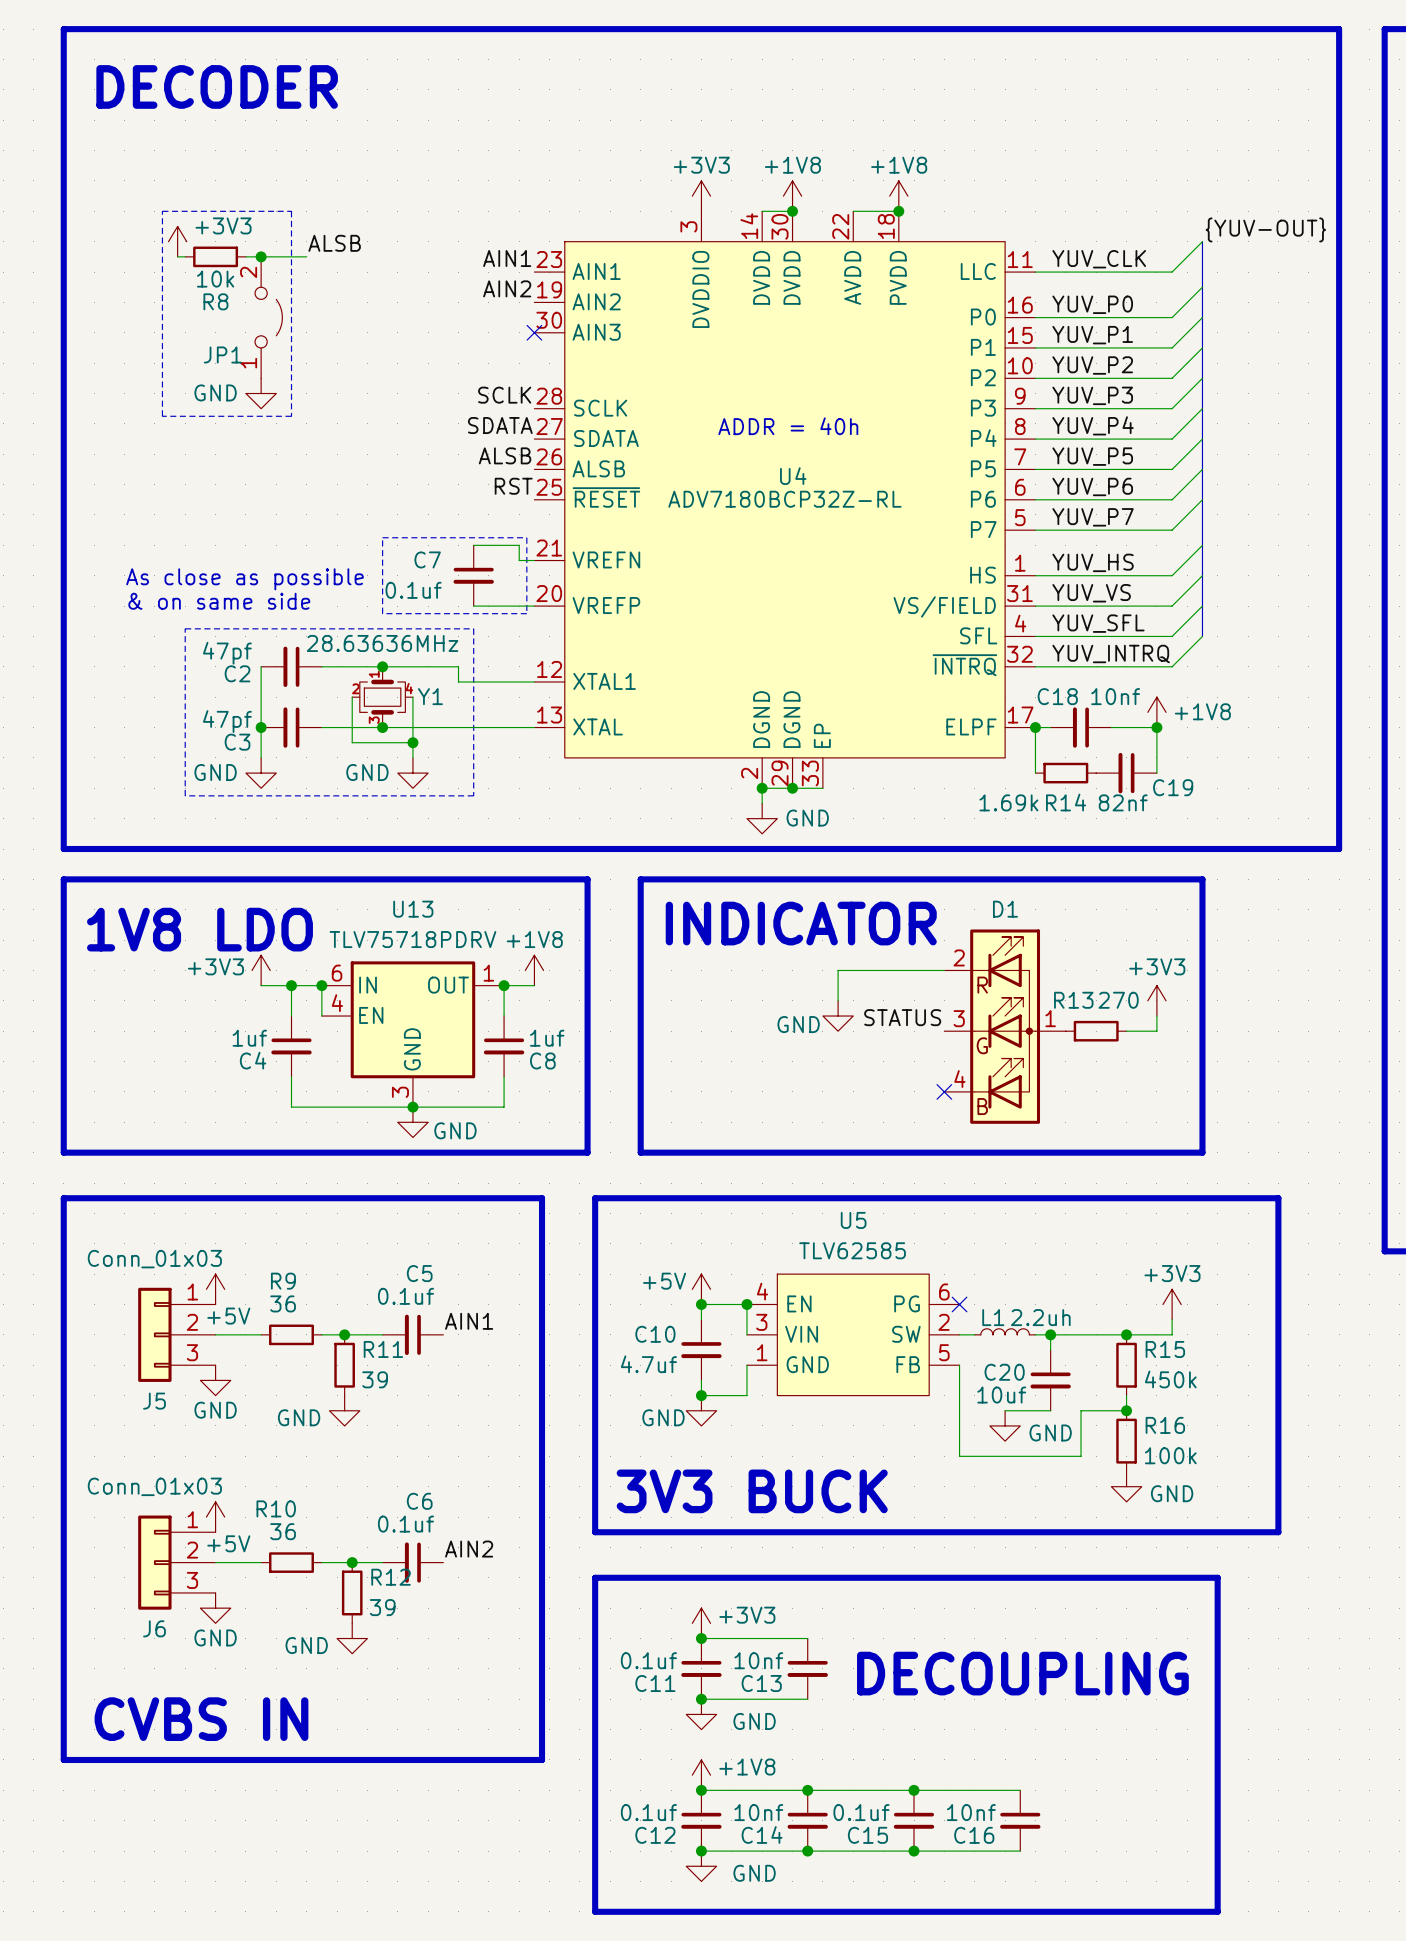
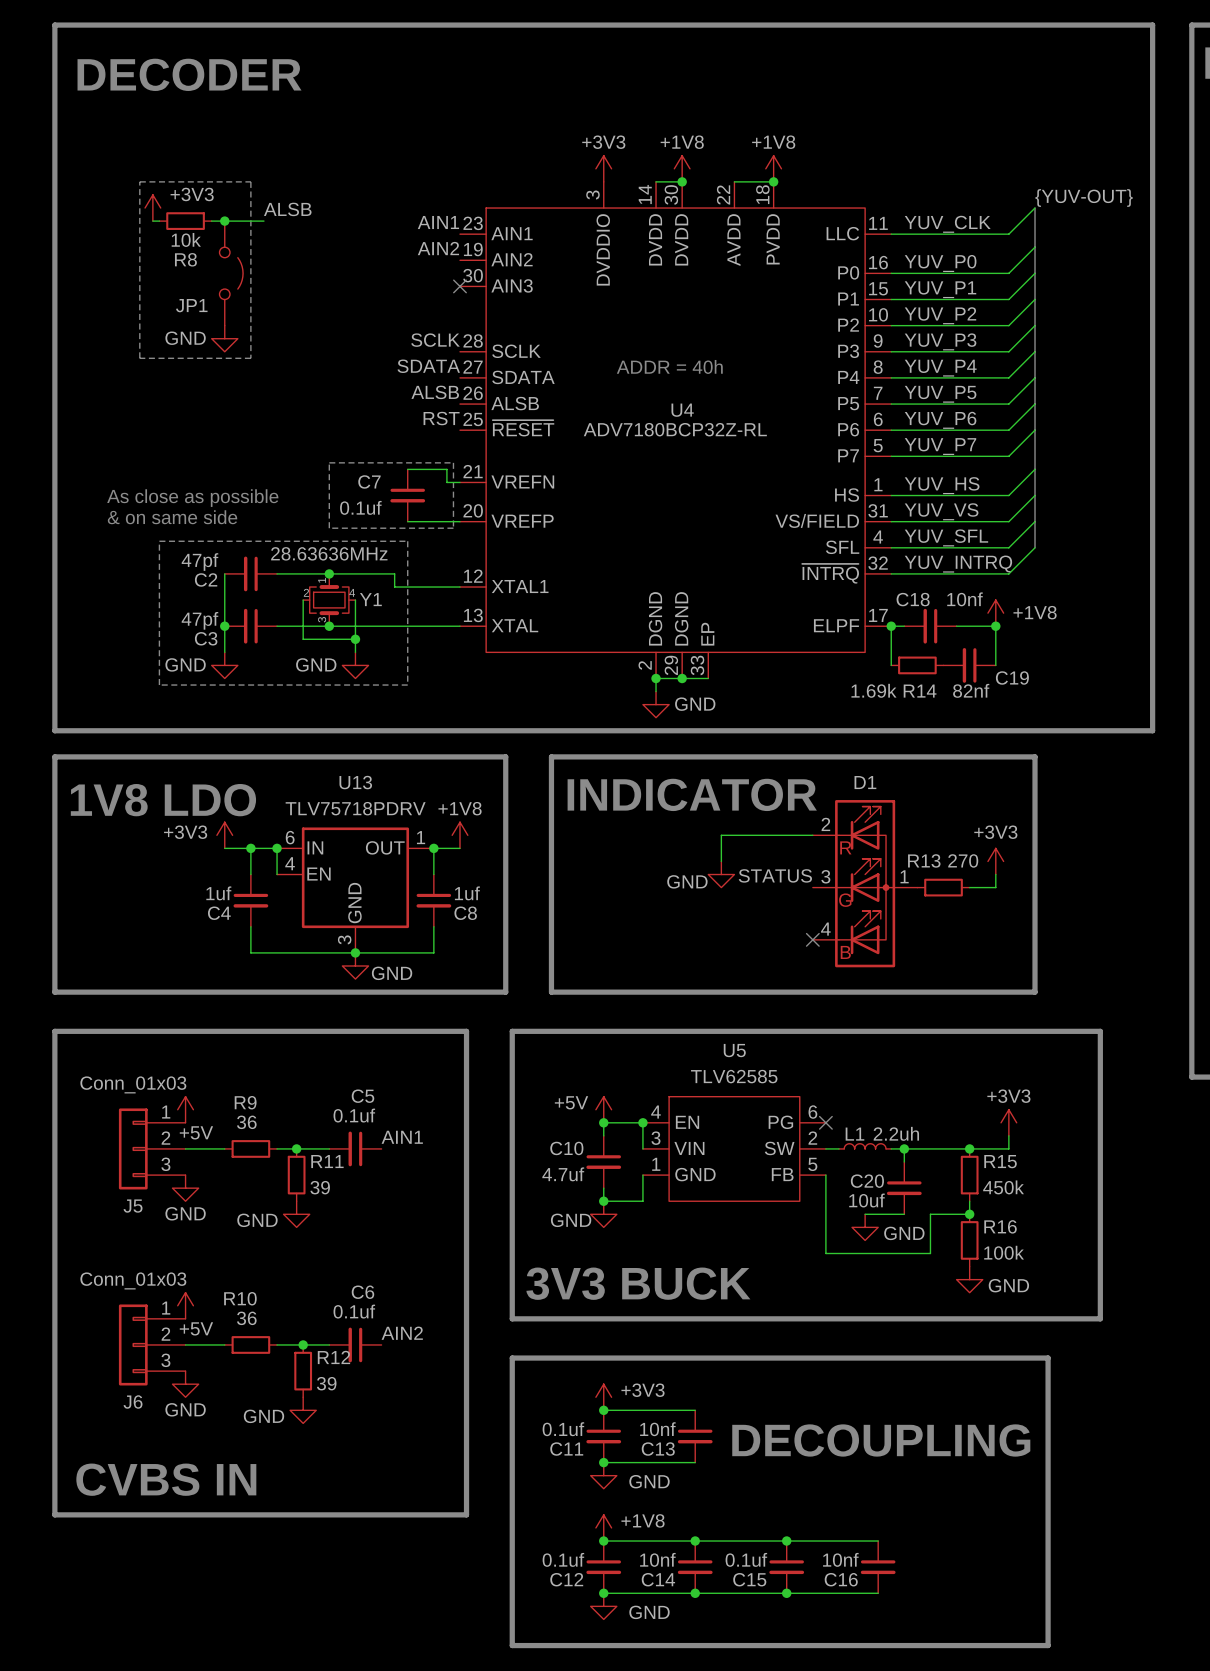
JP1 pin number: 2 (248, 272) -> none
JP1 pin number: 1 (248, 363) -> none

